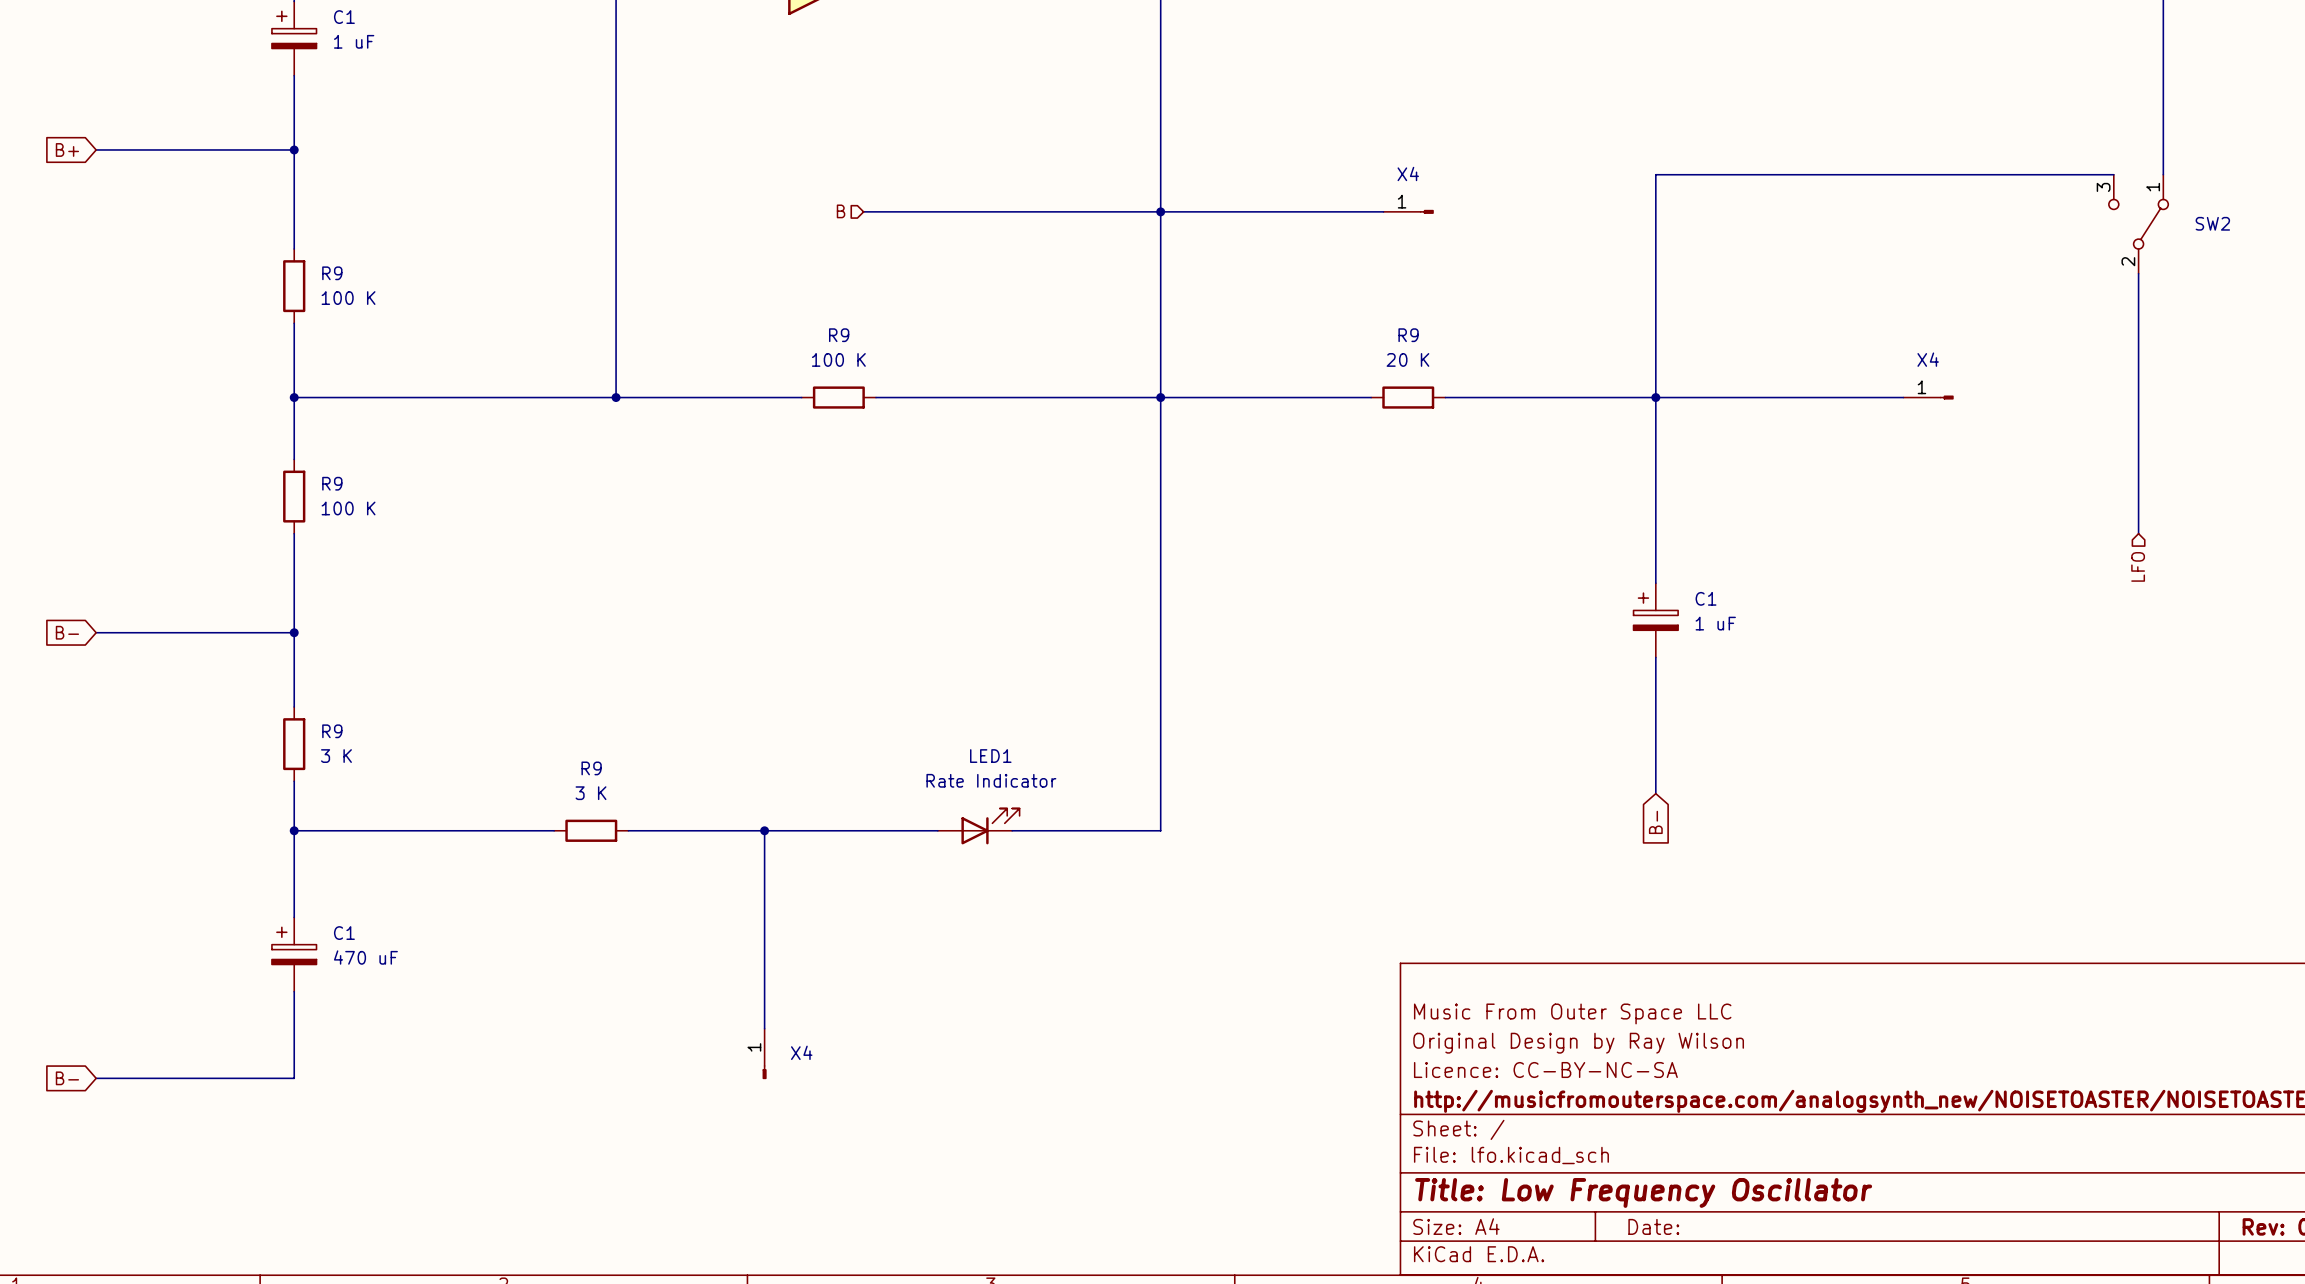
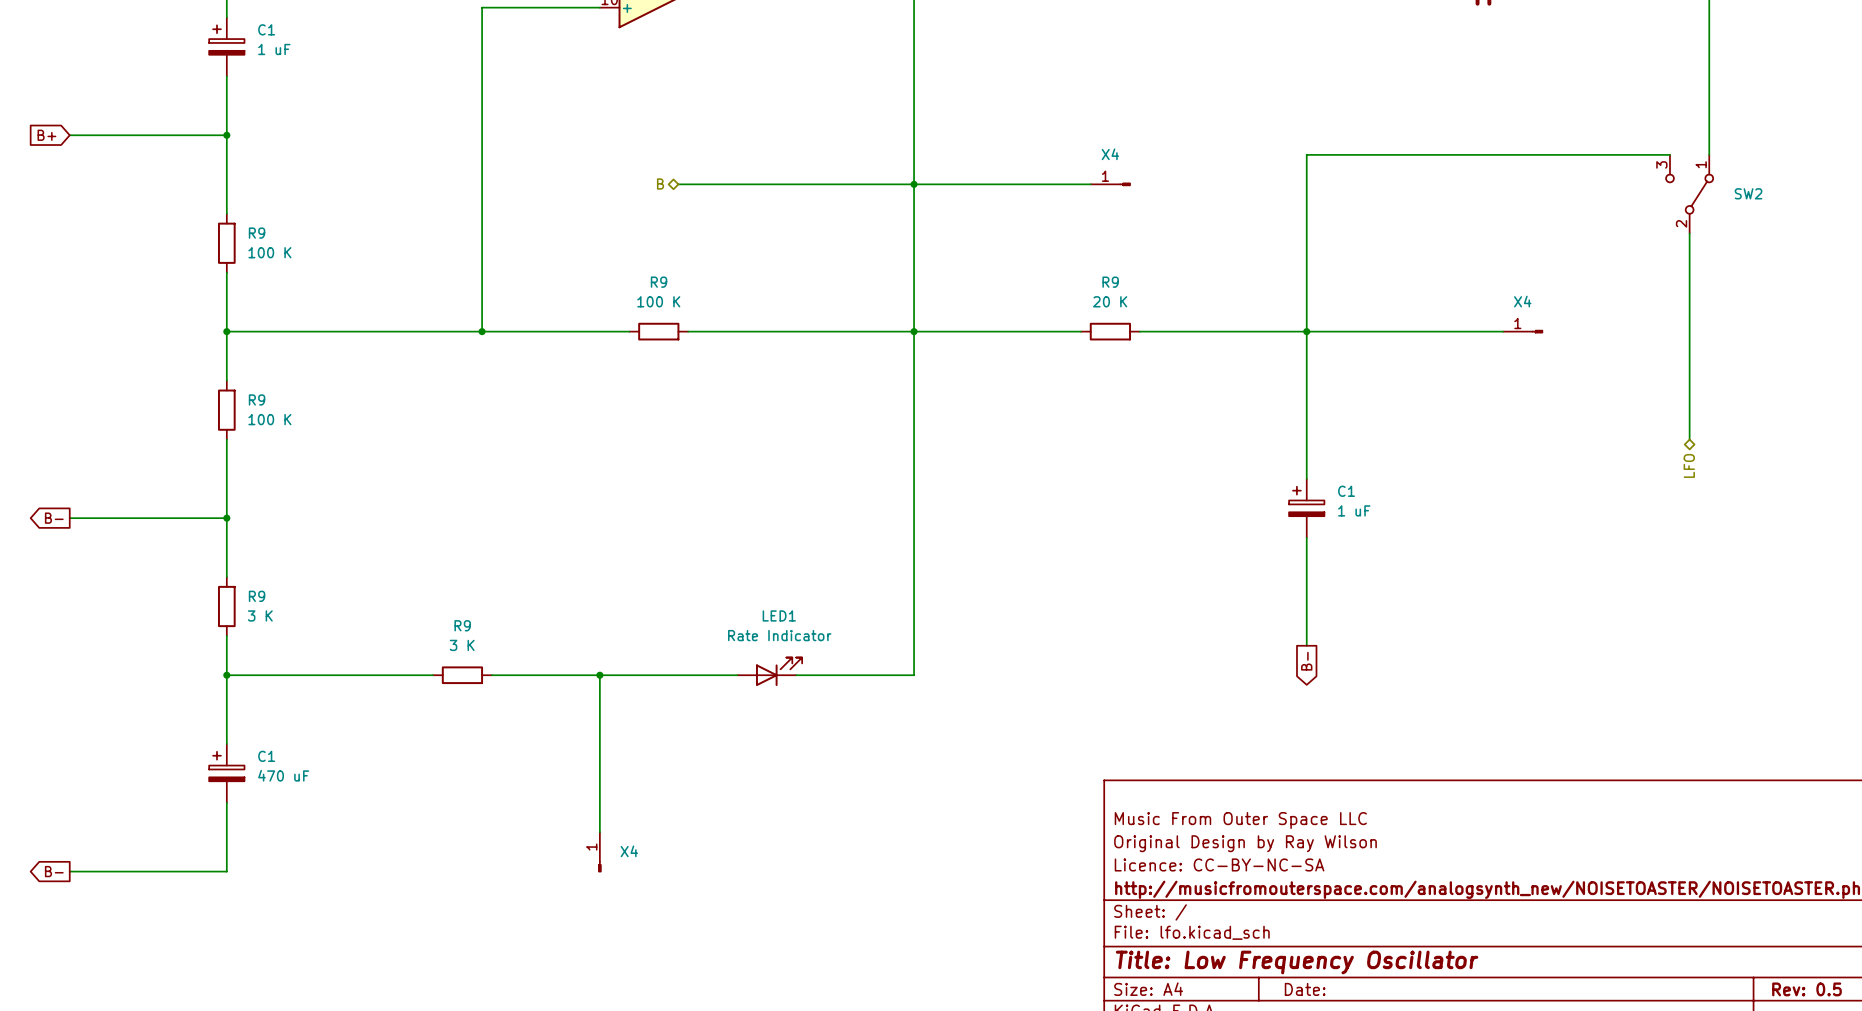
hierarchical label shape: input (841, 211) -> bidirectional (660, 183)
hierarchical label shape: input (2138, 566) -> bidirectional (1689, 465)
global label shape: input (67, 632) -> output (54, 518)
global label shape: input (1655, 822) -> output (1306, 661)
global label shape: input (67, 1078) -> output (54, 871)

